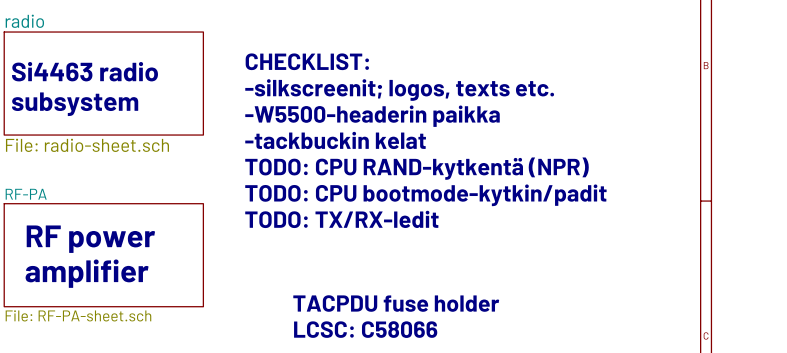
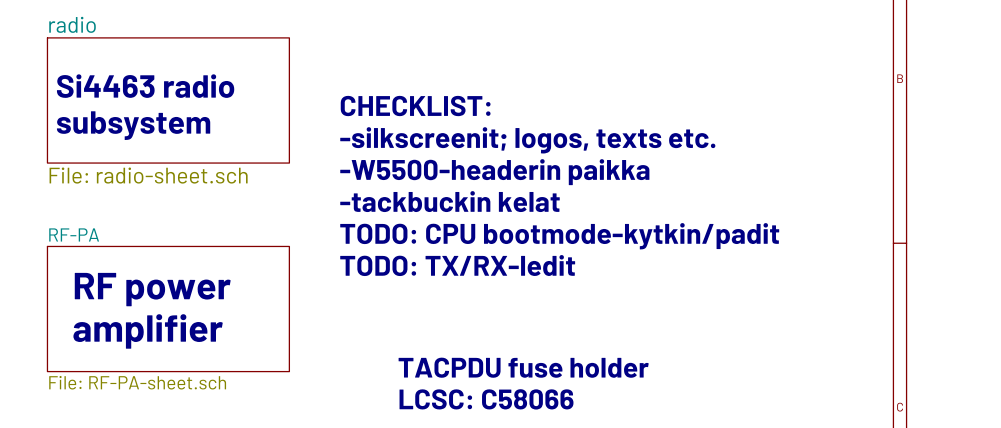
text: CHECKLIST: (307, 61) -> none
text: -silkscreenit; logos, texts etc. (399, 90) -> CHECKLIST: (415, 106)
text: -W5500-headerin paikka (372, 116) -> -silkscreenit; logos, texts etc. (527, 140)
text: -tackbuckin kelat (335, 140) -> -W5500-headerin paikka (494, 172)
text: TODO: CPU RAND-kytkentä (NPR) (417, 168) -> -tackbuckin kelat (450, 201)

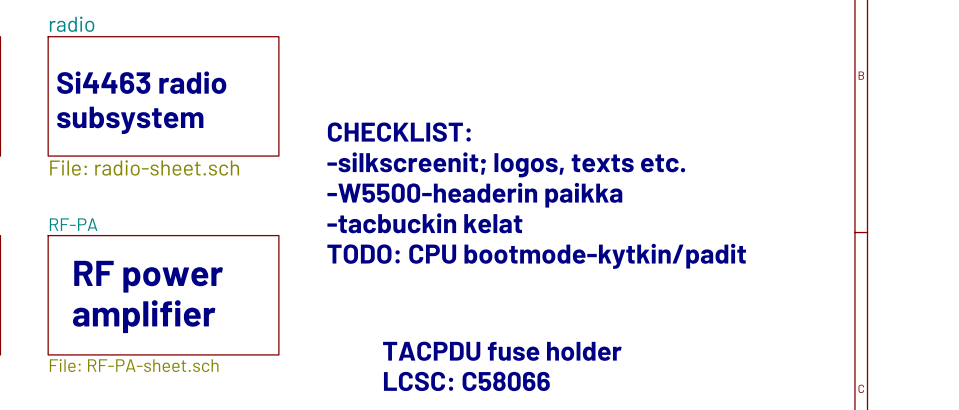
text: CHECKLIST: (415, 106) -> none
text: -silkscreenit; logos, texts etc. (527, 140) -> CHECKLIST: (399, 132)
text: -W5500-headerin paikka (494, 172) -> -silkscreenit; logos, texts etc. (506, 164)
text: -tackbuckin kelat (450, 201) -> -W5500-headerin paikka (474, 195)
text: TODO: CPU bootmode-kytkin/padit (559, 236) -> -tacbuckin kelat (424, 223)
text: TODO: TX/RX-ledit (457, 265) -> TODO: CPU bootmode-kytkin/padit (536, 256)

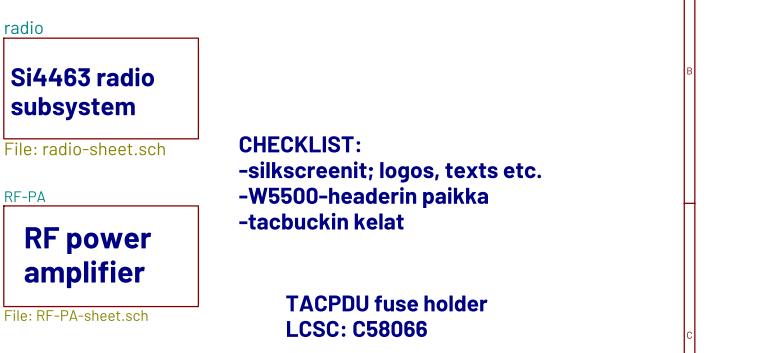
text: CHECKLIST: (399, 132) -> none
text: -silkscreenit; logos, texts etc. (506, 164) -> CHECKLIST: (299, 144)
text: -W5500-headerin paikka (474, 195) -> -silkscreenit; logos, texts etc. (390, 171)
text: -tacbuckin kelat (424, 223) -> -W5500-headerin paikka (363, 197)
text: TODO: CPU bootmode-kytkin/padit (536, 256) -> -tacbuckin kelat (321, 221)

